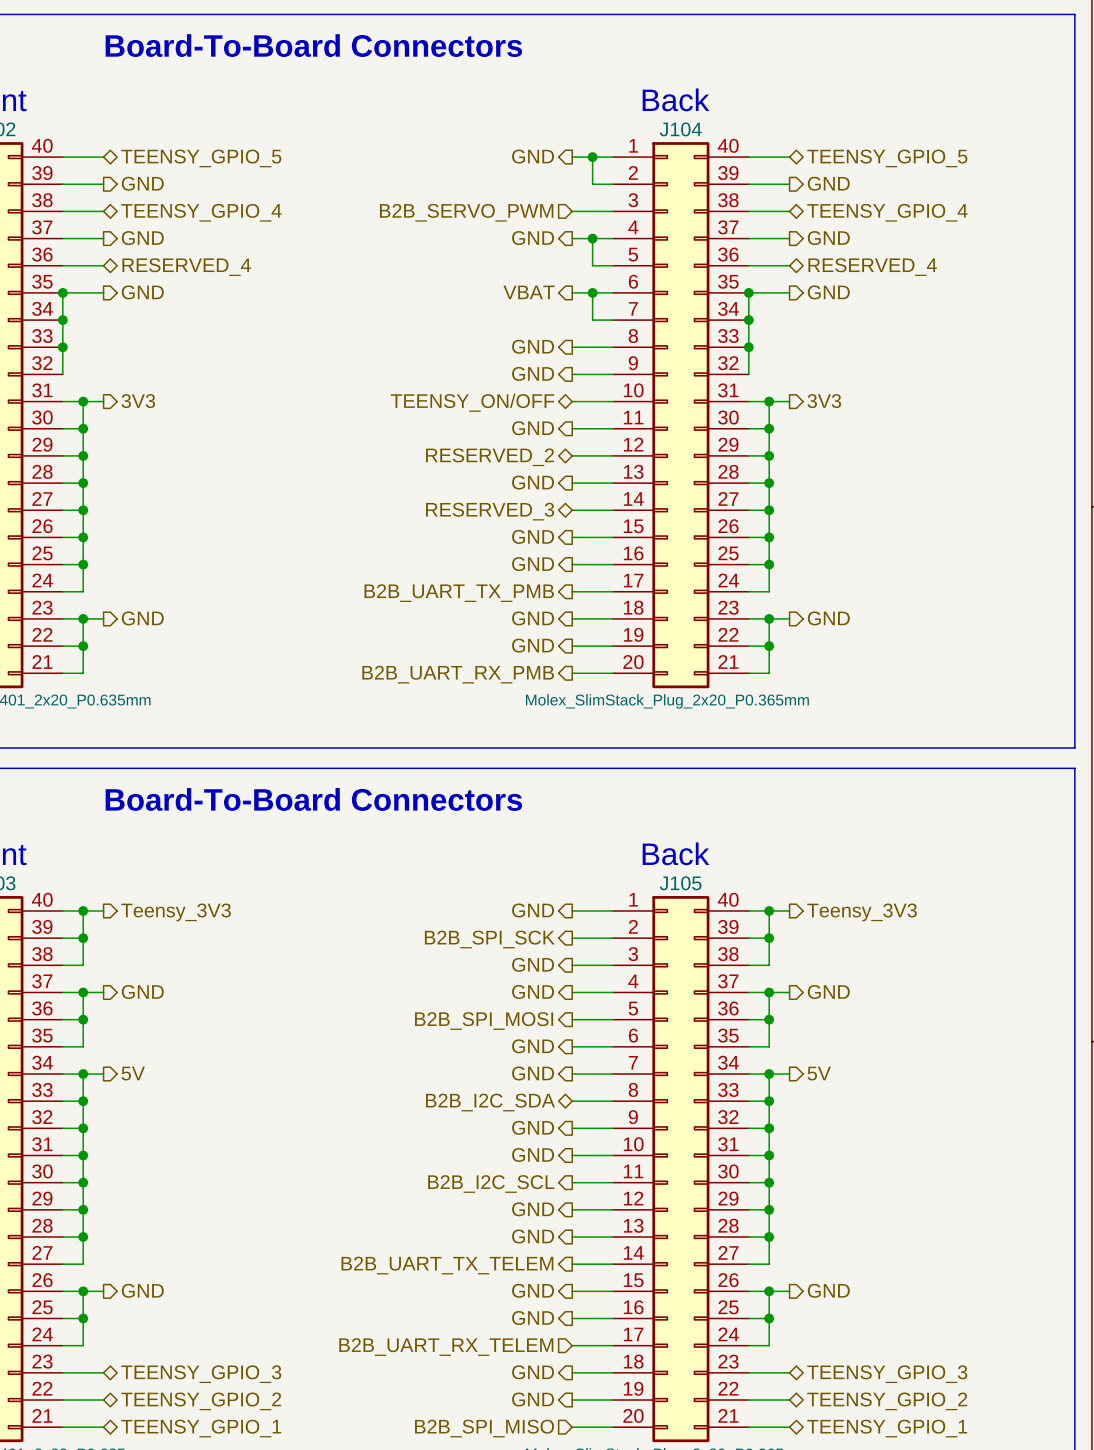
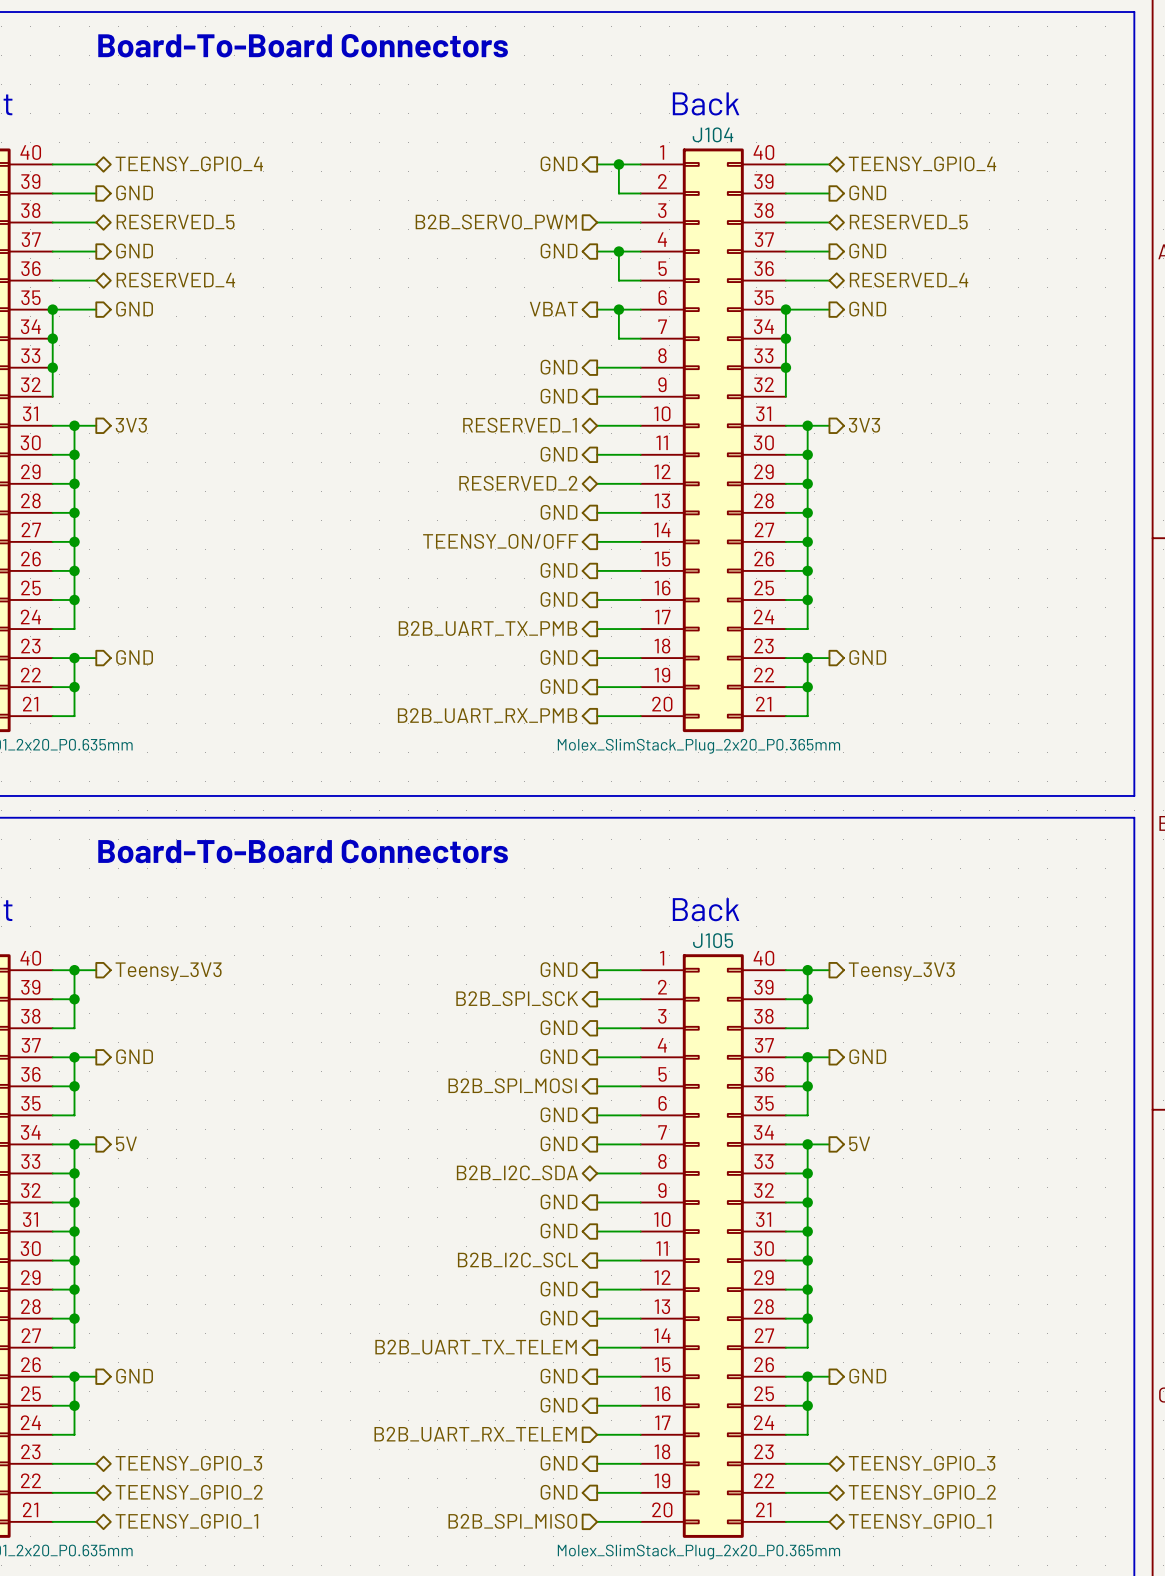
hierarchical label: TEENSY_GPIO_5 (201, 158) -> TEENSY_GPIO_4 (189, 163)
hierarchical label: TEENSY_GPIO_5 (887, 158) -> TEENSY_GPIO_4 (922, 163)
hierarchical label: TEENSY_GPIO_4 (201, 212) -> RESERVED_5 (175, 221)
hierarchical label: TEENSY_GPIO_4 (887, 212) -> RESERVED_5 (908, 221)
hierarchical label: TEENSY_ON/OFF (472, 402) -> RESERVED_1 (519, 425)
hierarchical label shape: bidirectional (490, 511) -> output (500, 541)
hierarchical label: RESERVED_3 (490, 511) -> TEENSY_ON/OFF (500, 541)

